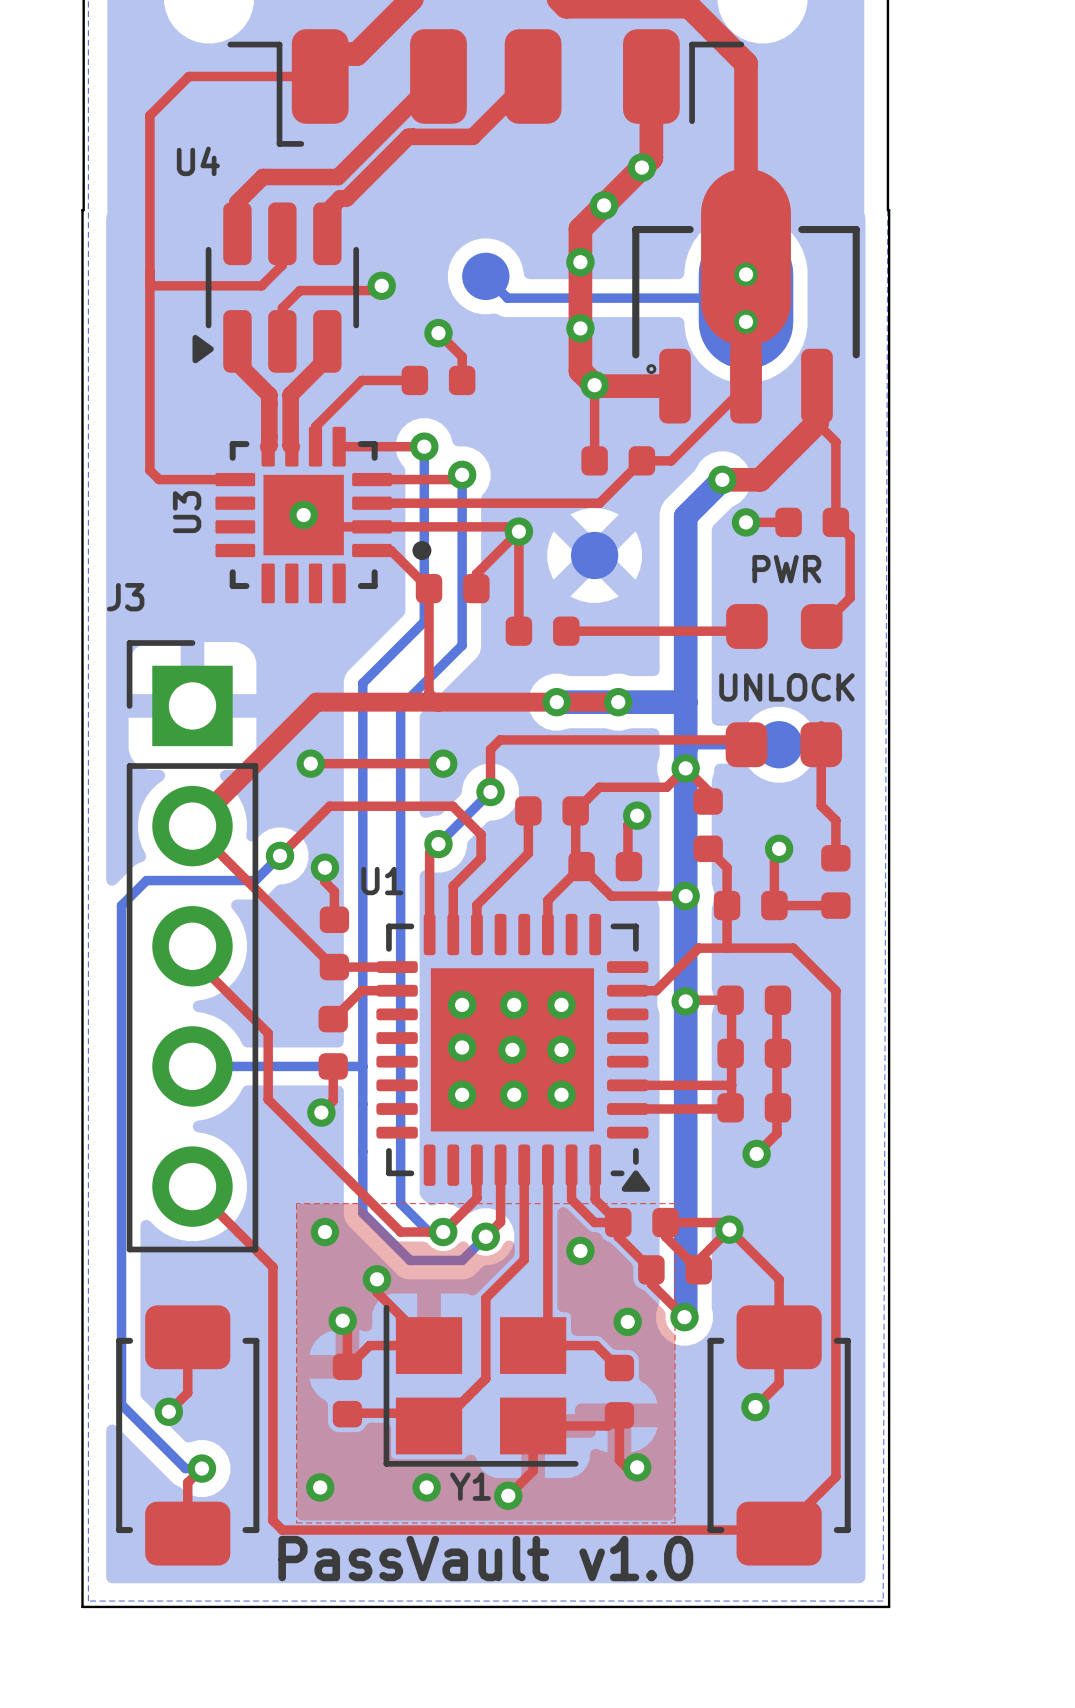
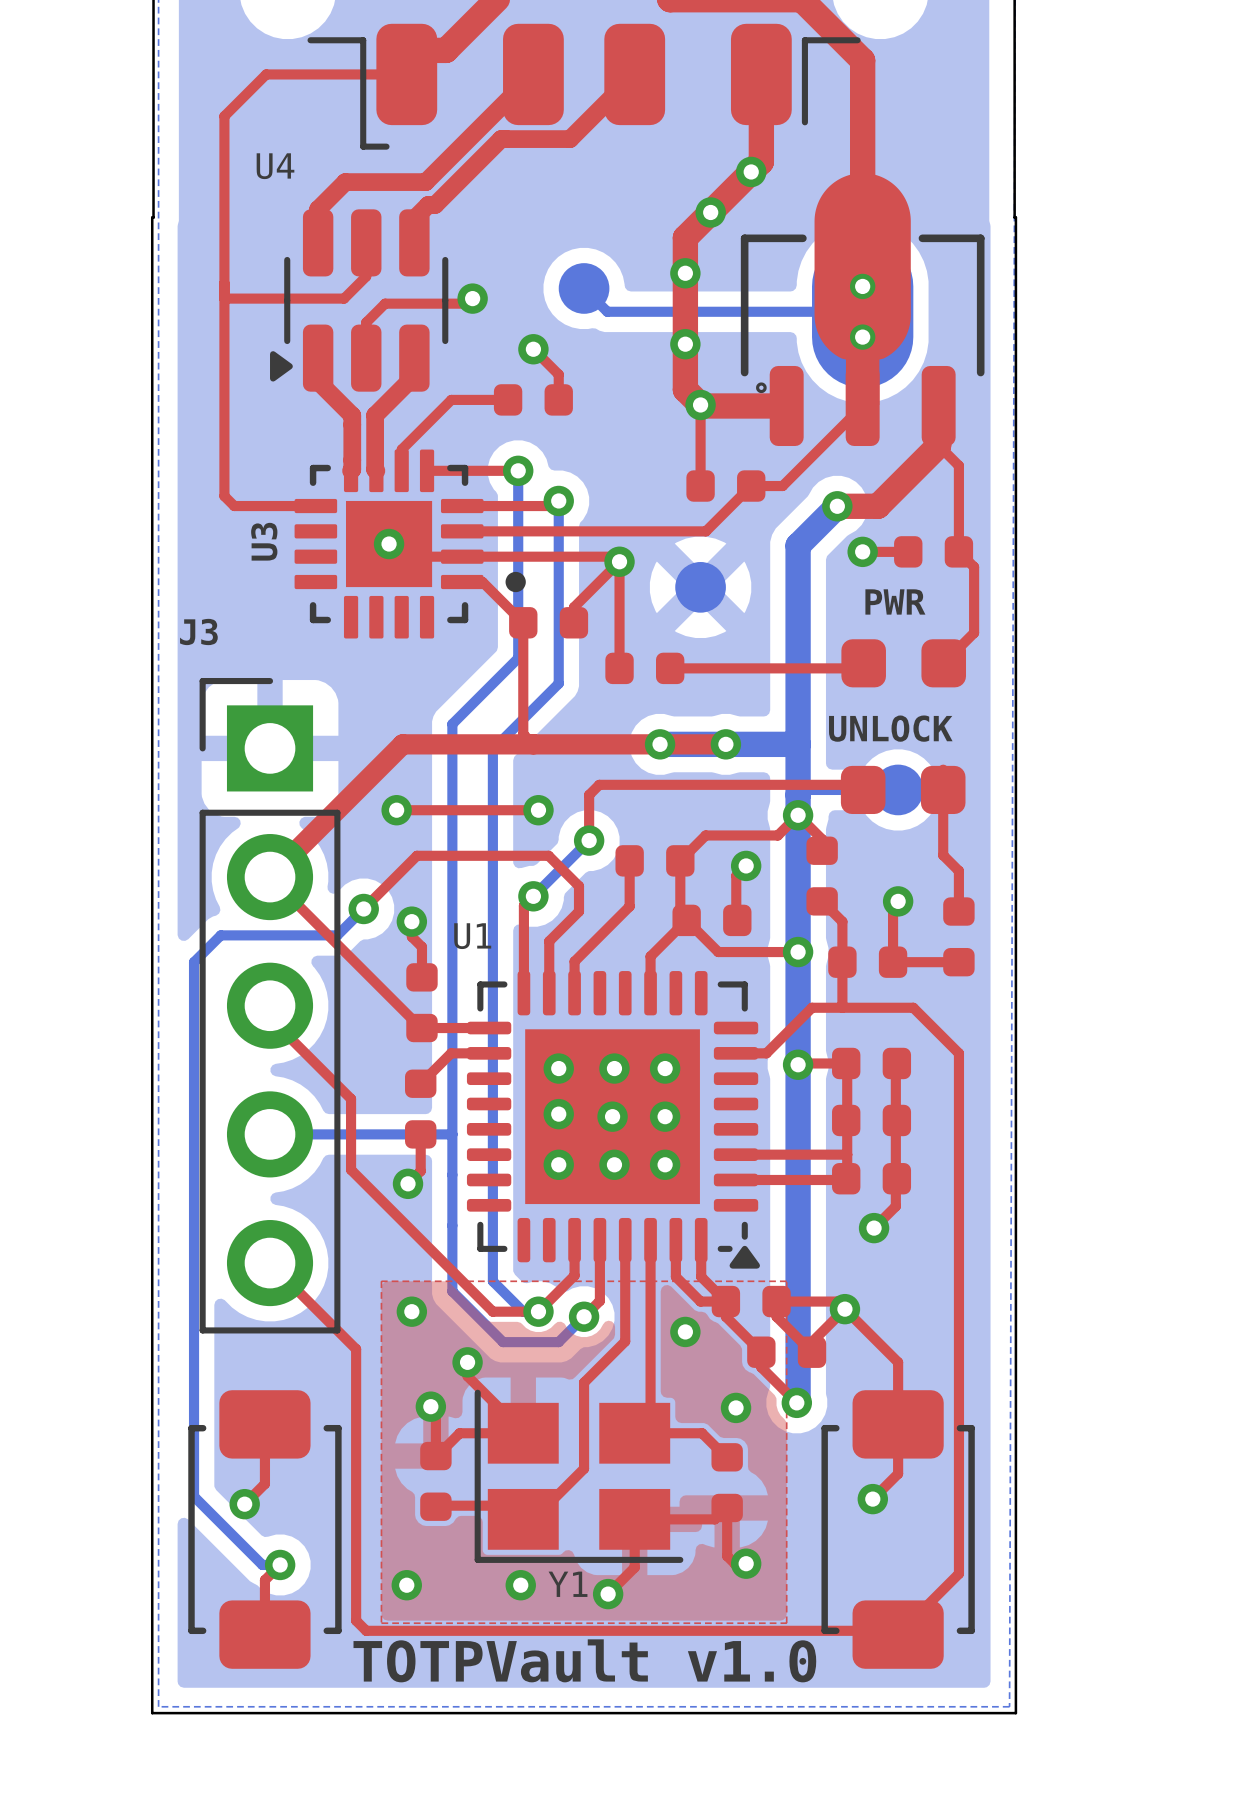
text: PassVault v1.0 (485, 1558) -> TOTPVault v1.0 (584, 1660)

